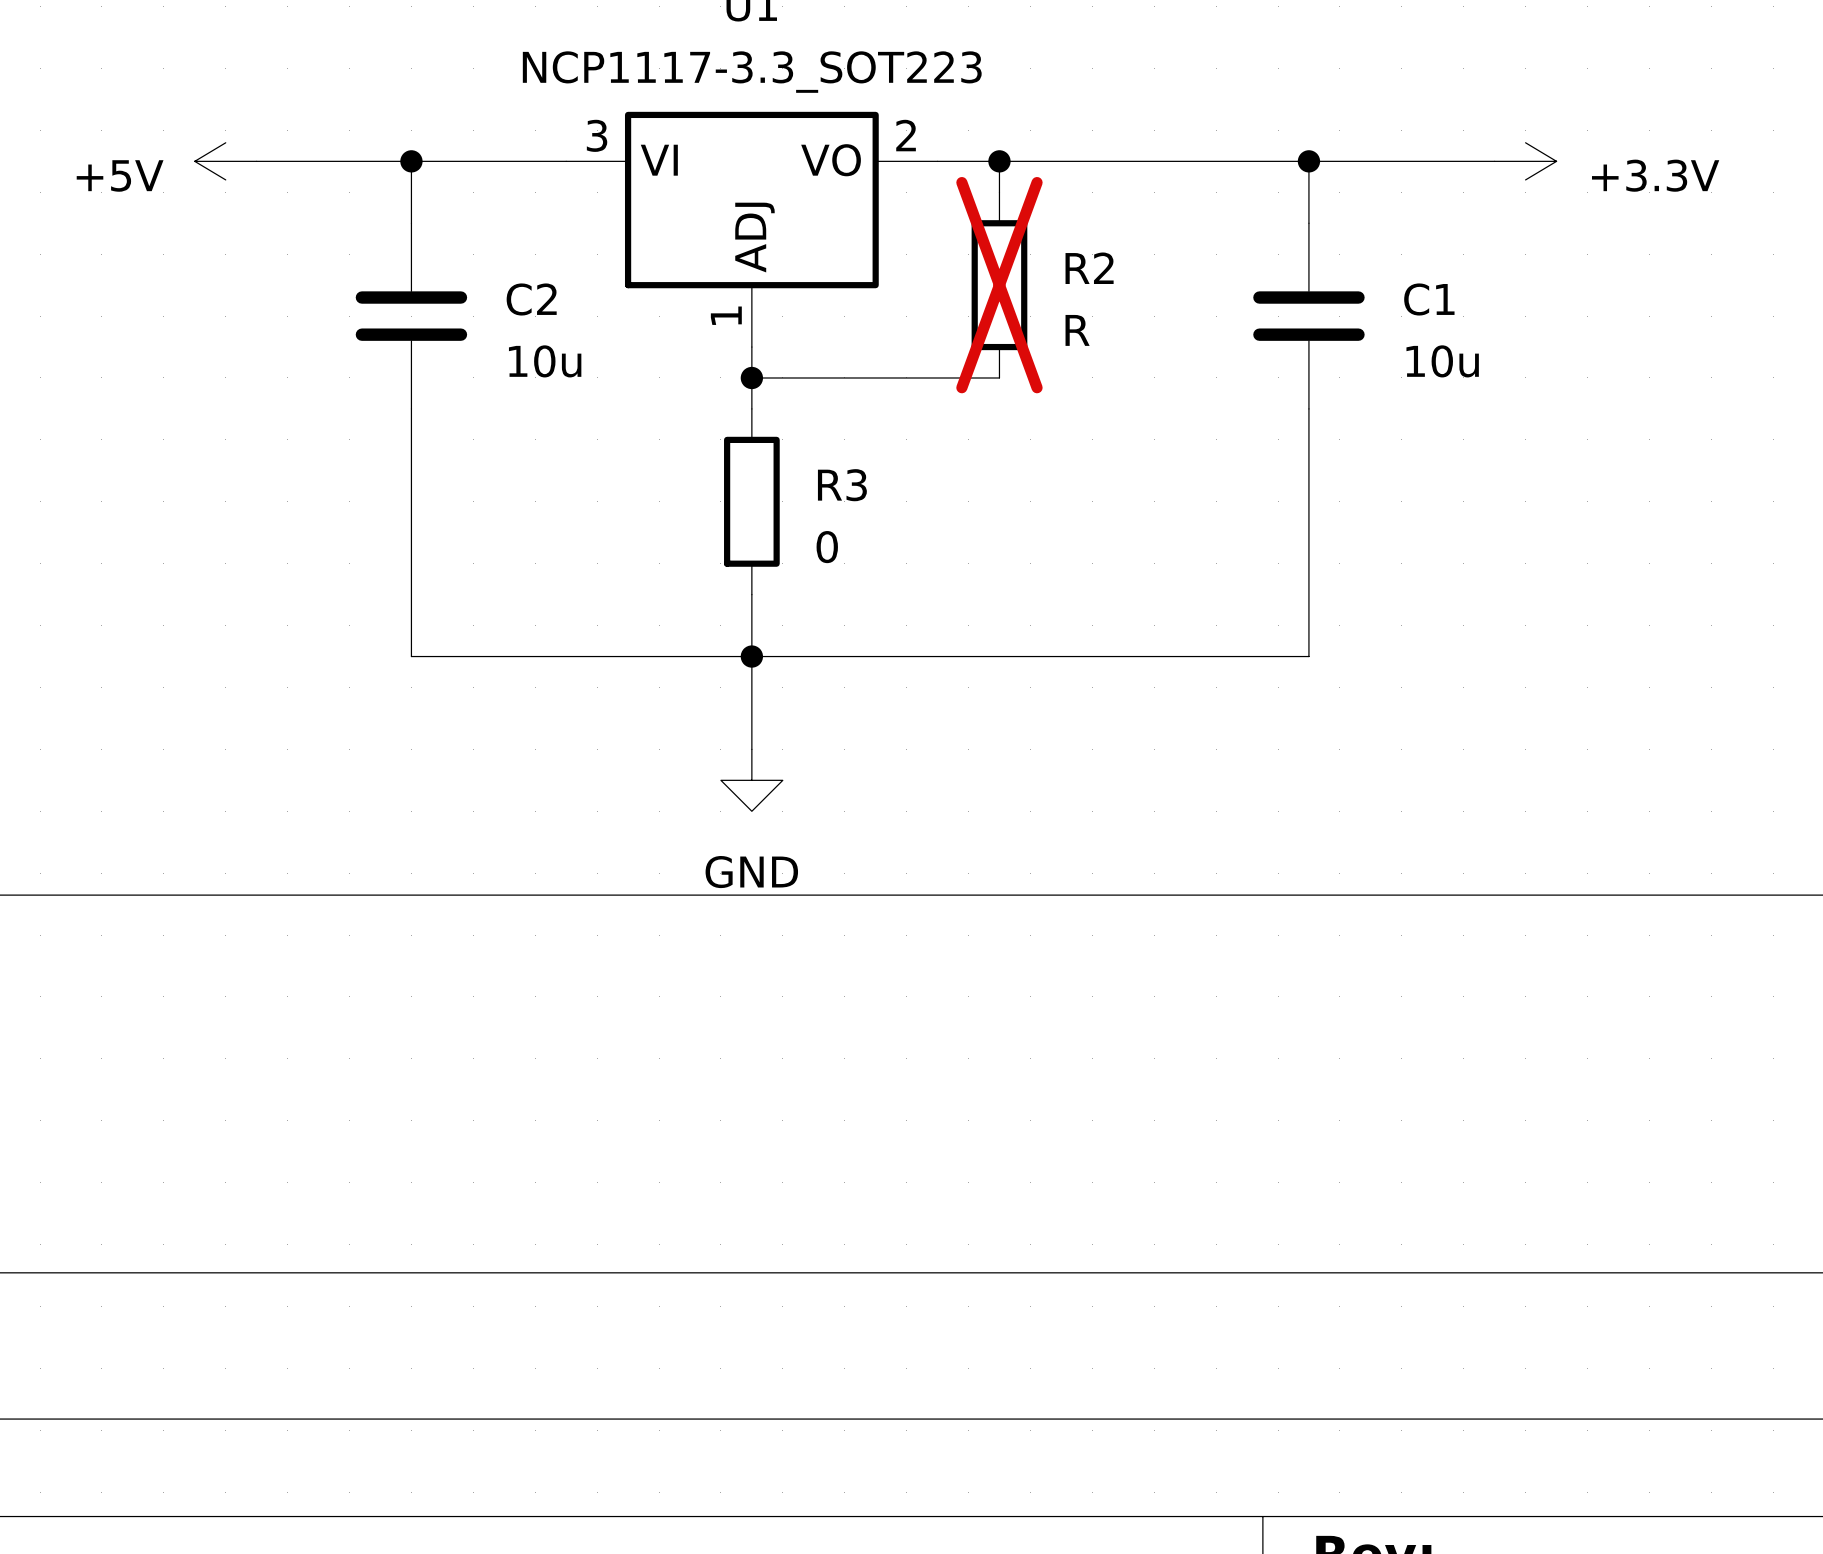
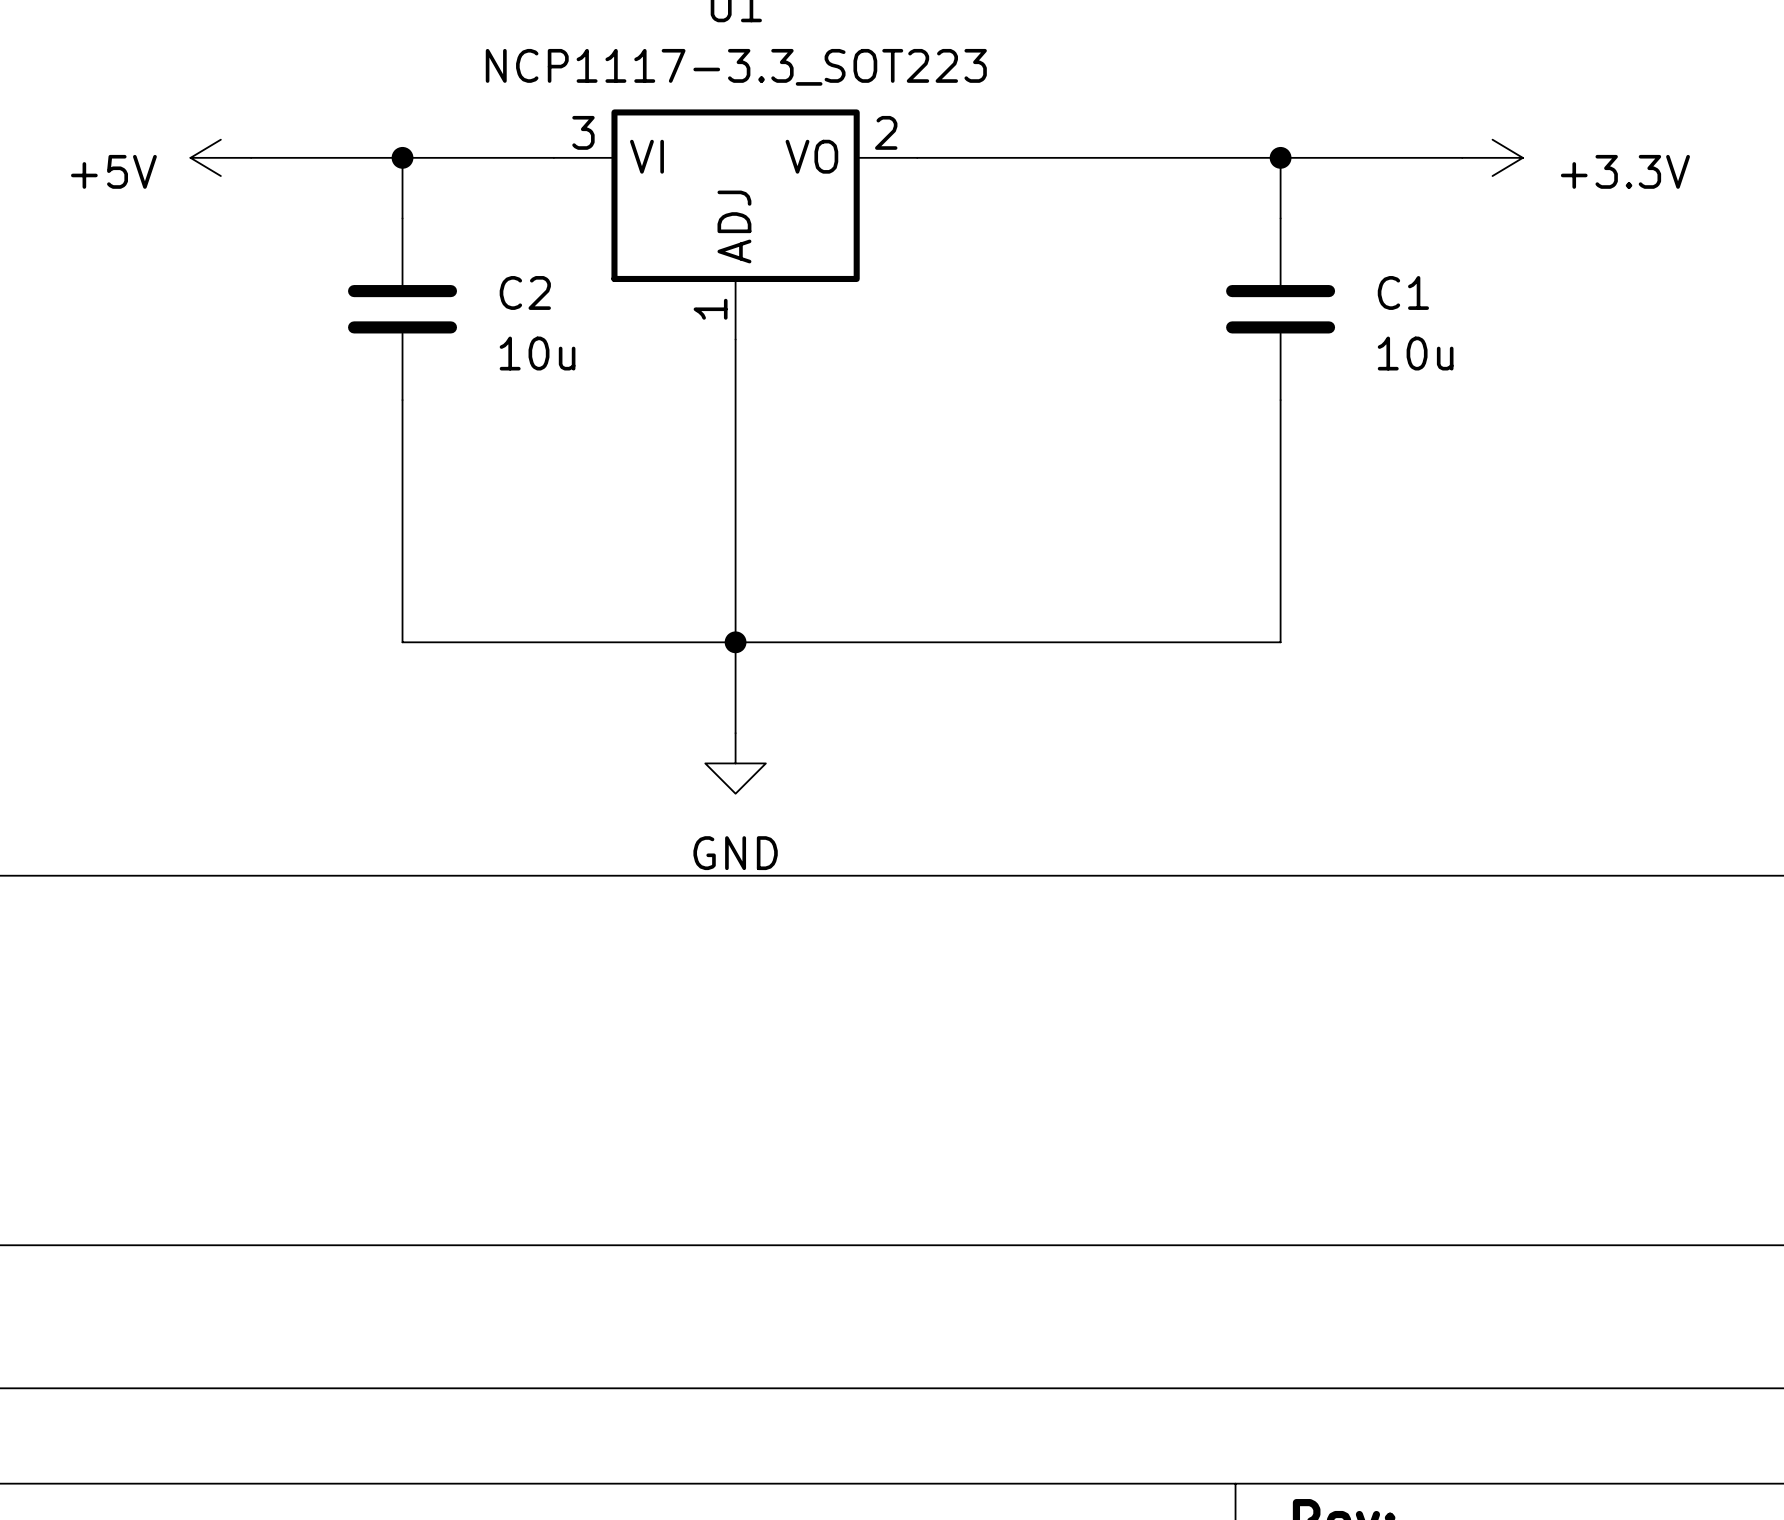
wire: (999, 161) (999, 192) -> none
junction: (999, 161) -> none
R2: R (999, 285) -> none
wire: (751, 377) (999, 377) -> none
junction: (751, 377) -> none
wire: none -> (735, 400) (735, 581)
R3: 0 (751, 501) -> none

